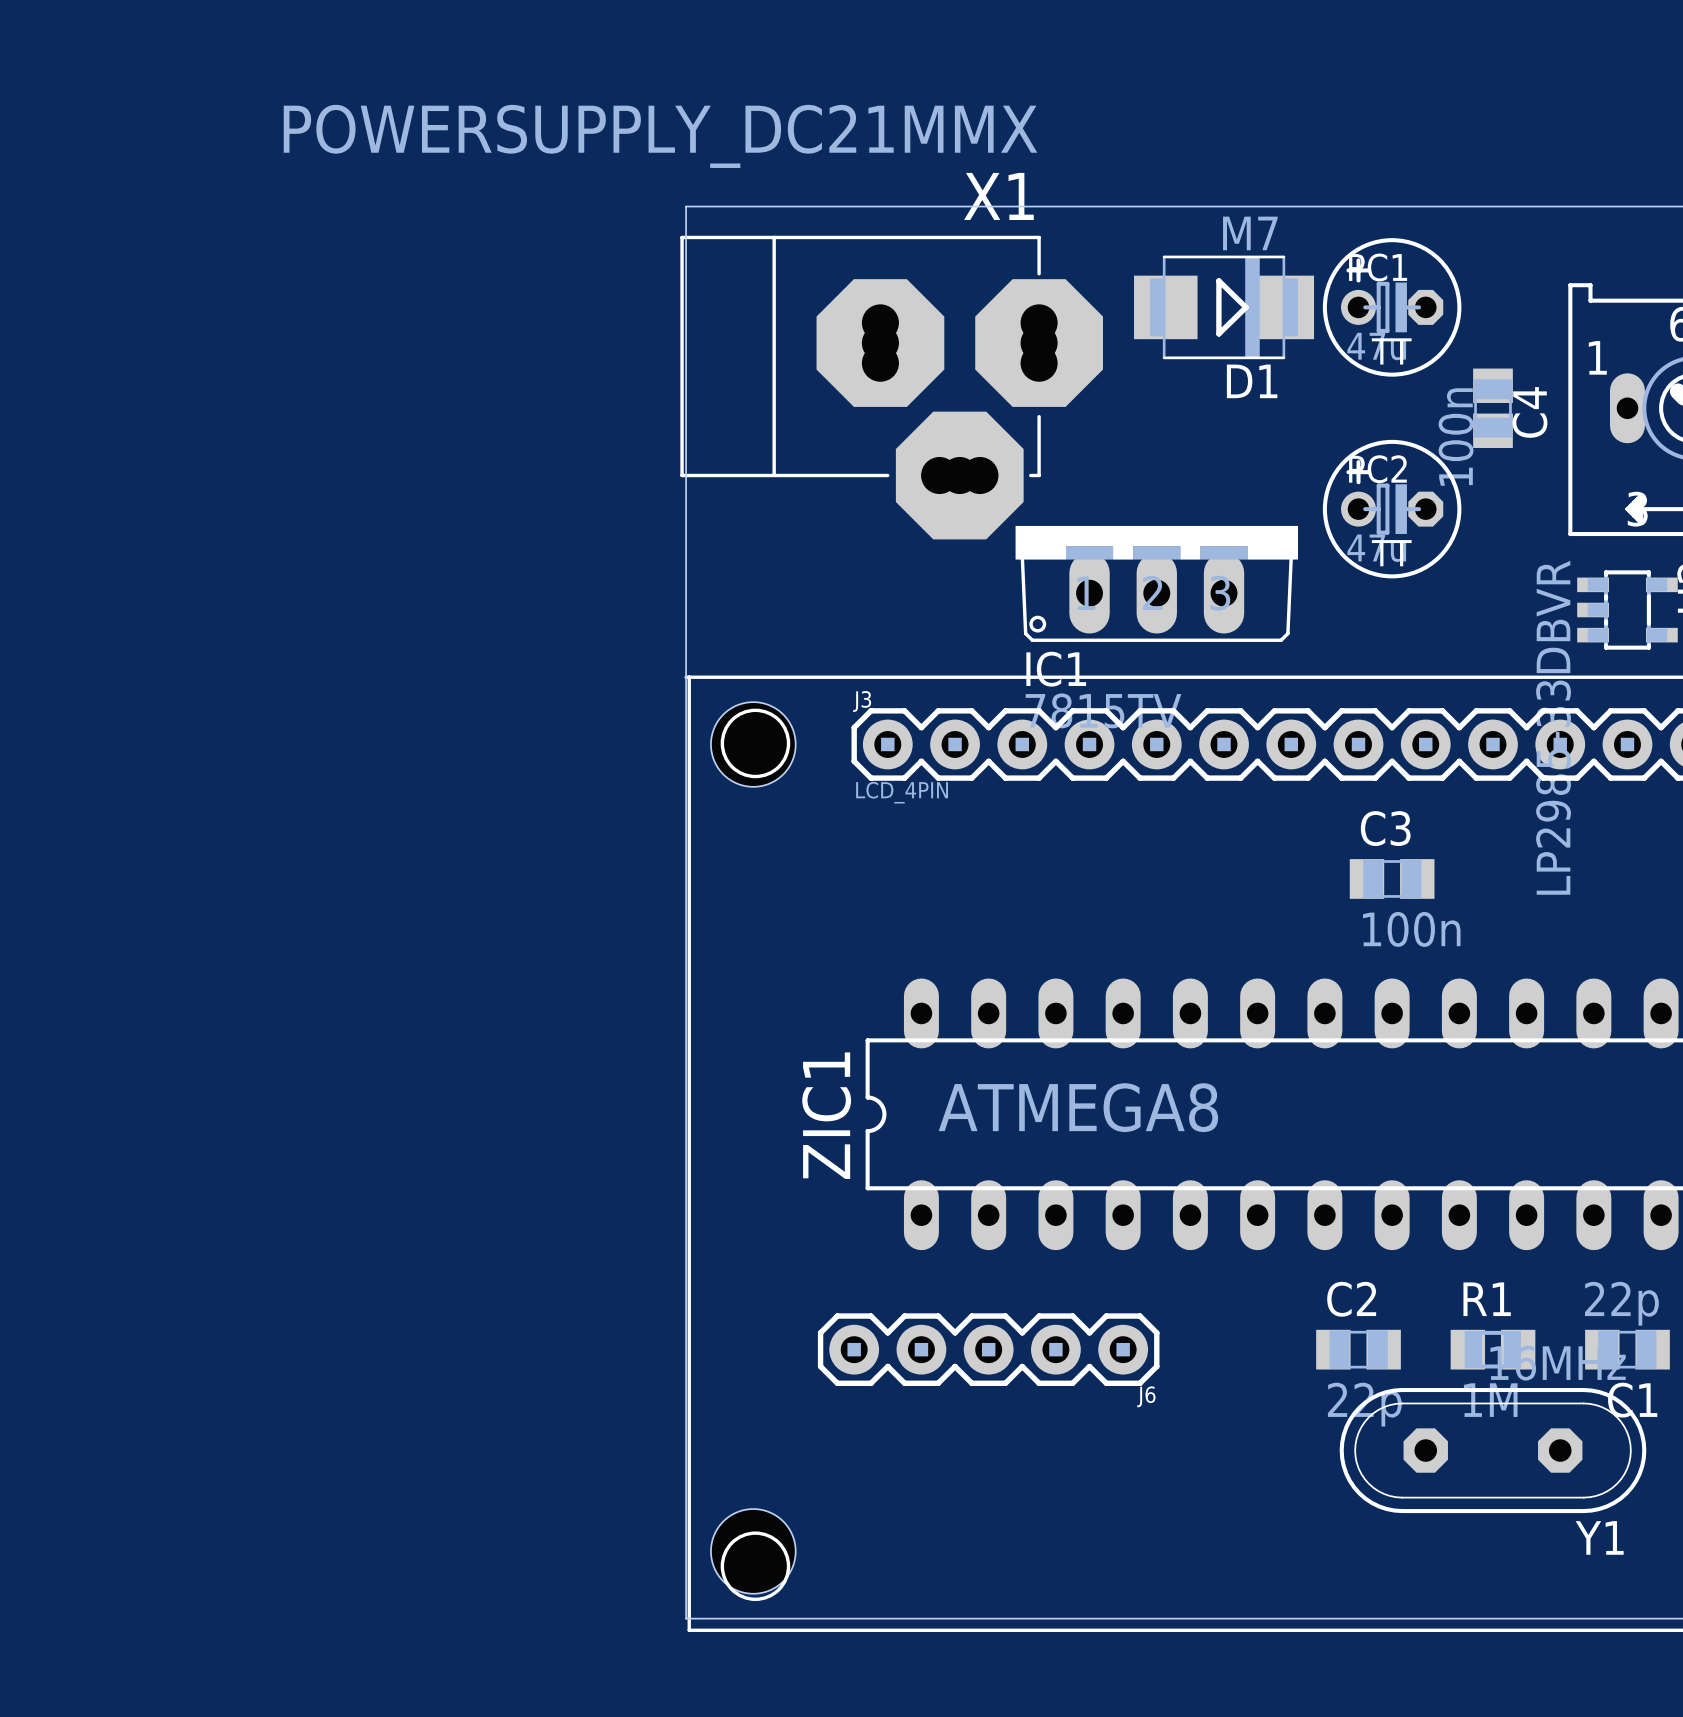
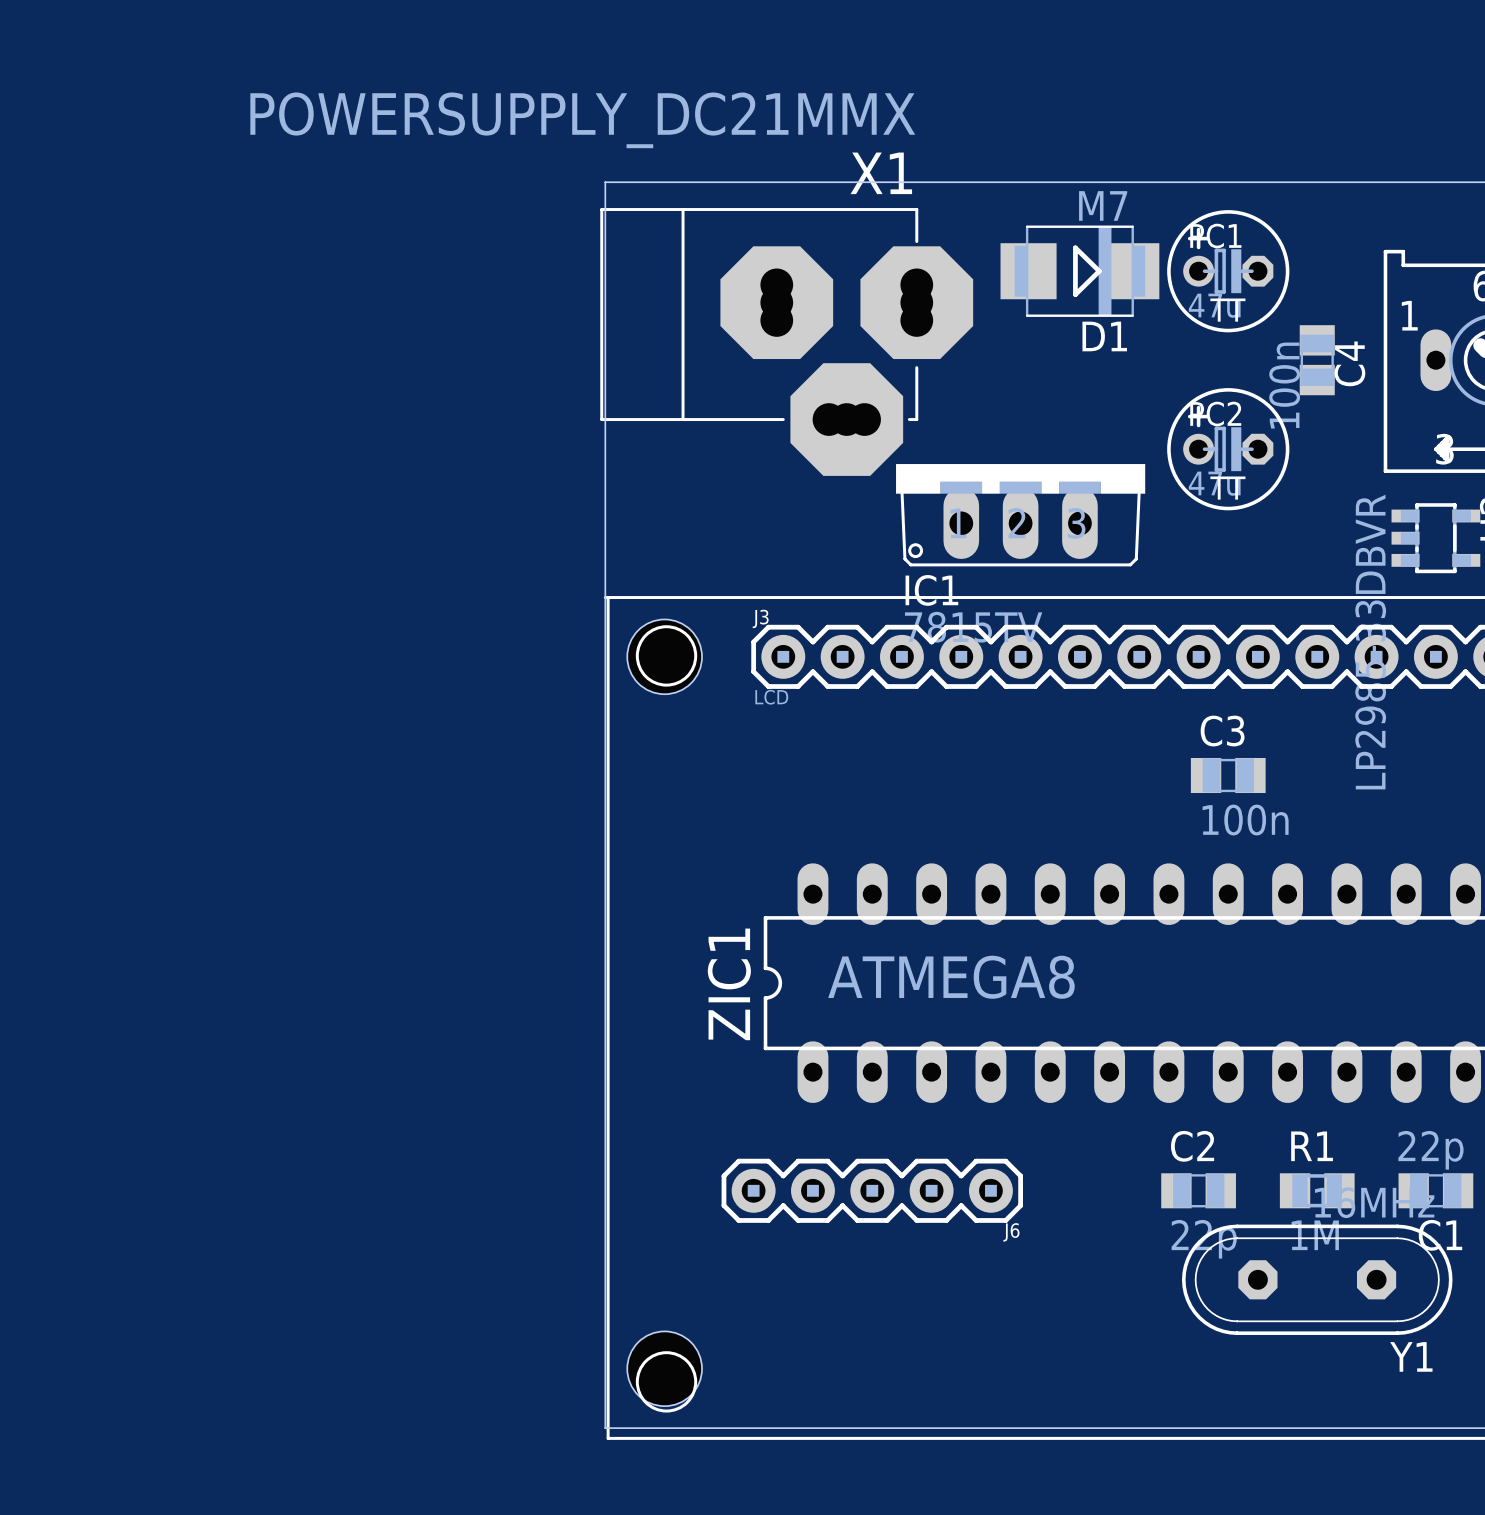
J3 value: LCD_4PIN (902, 792) -> LCD (771, 697)

